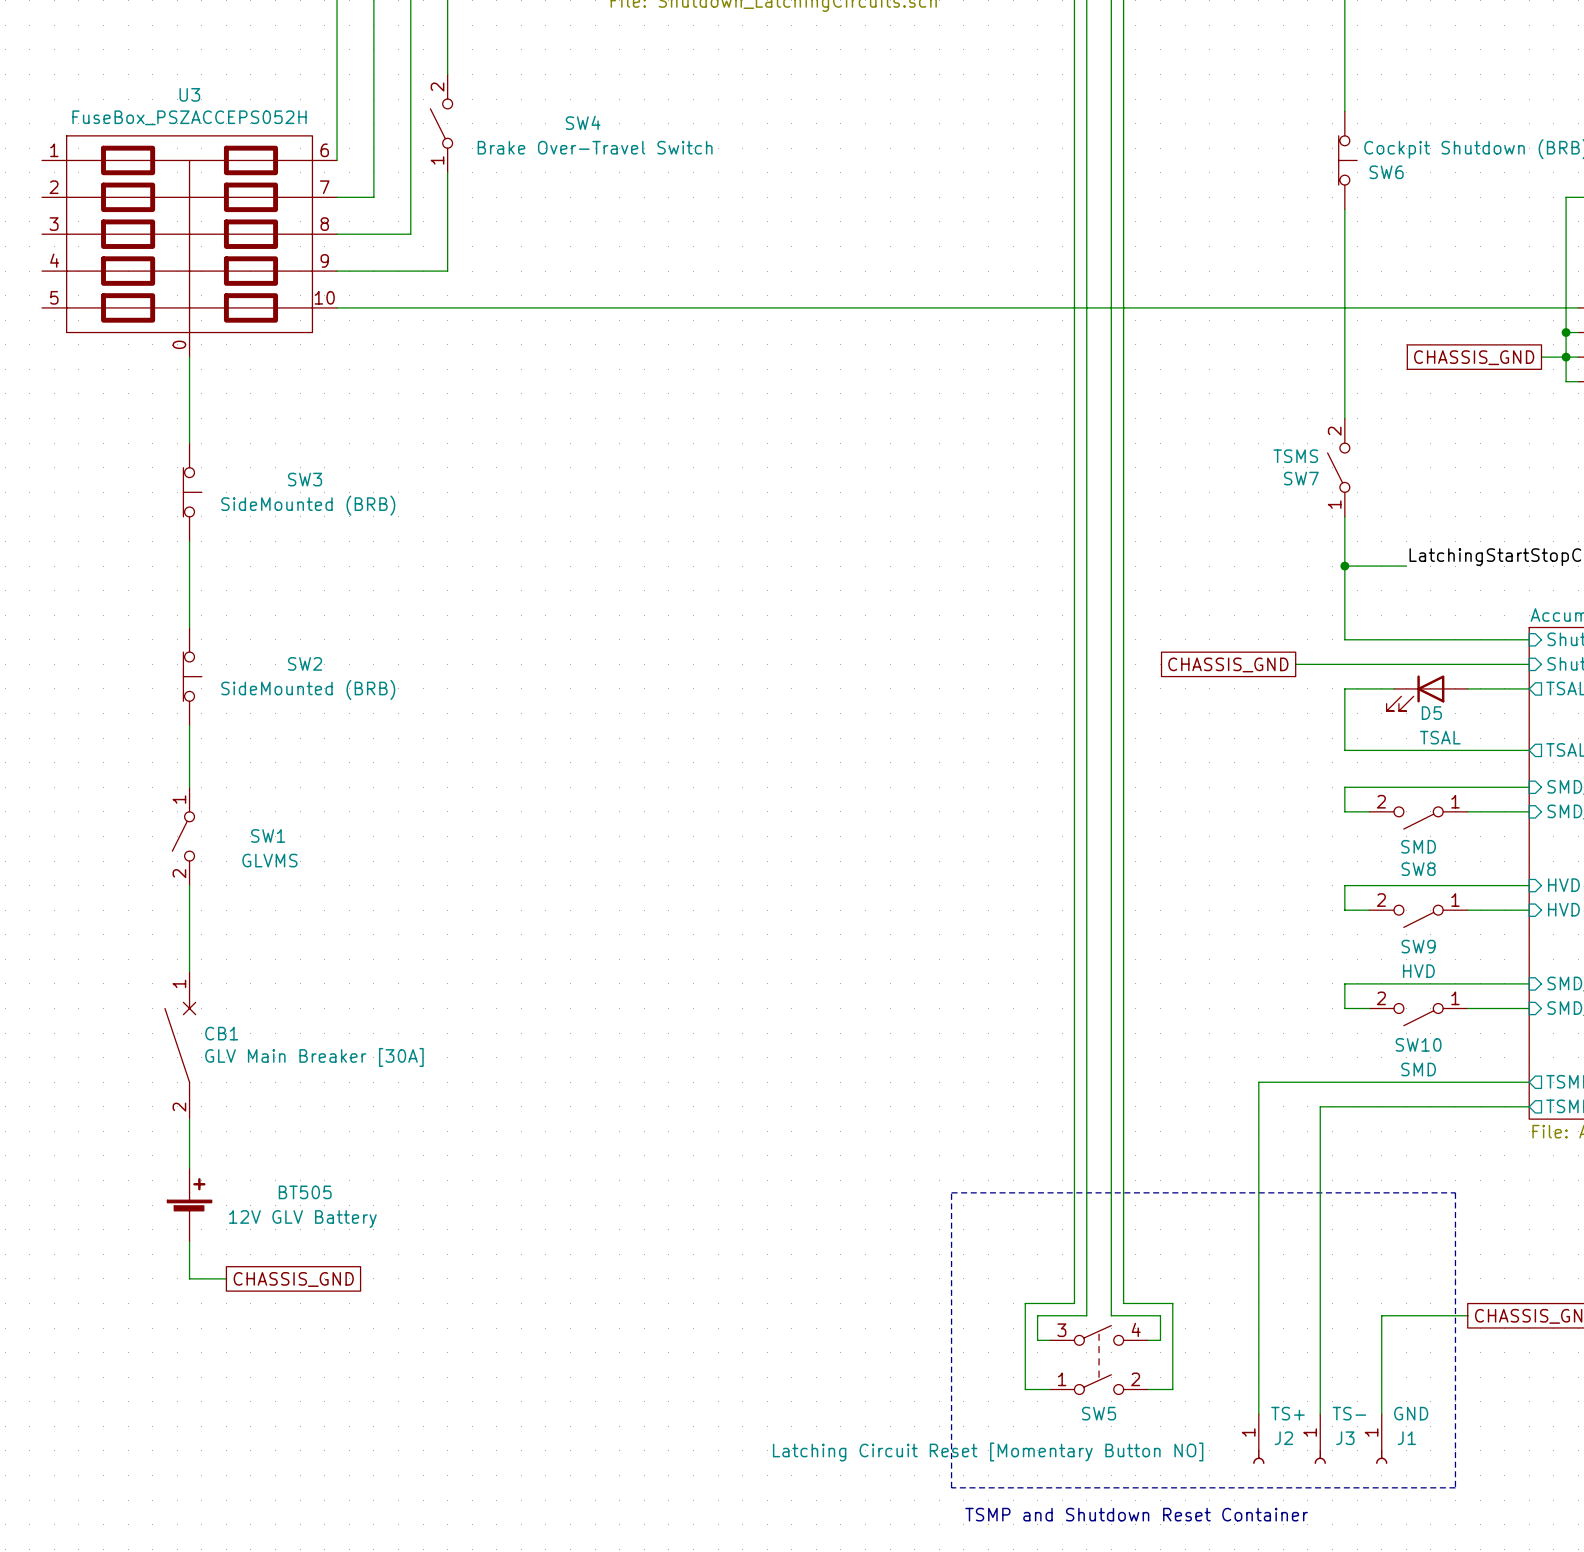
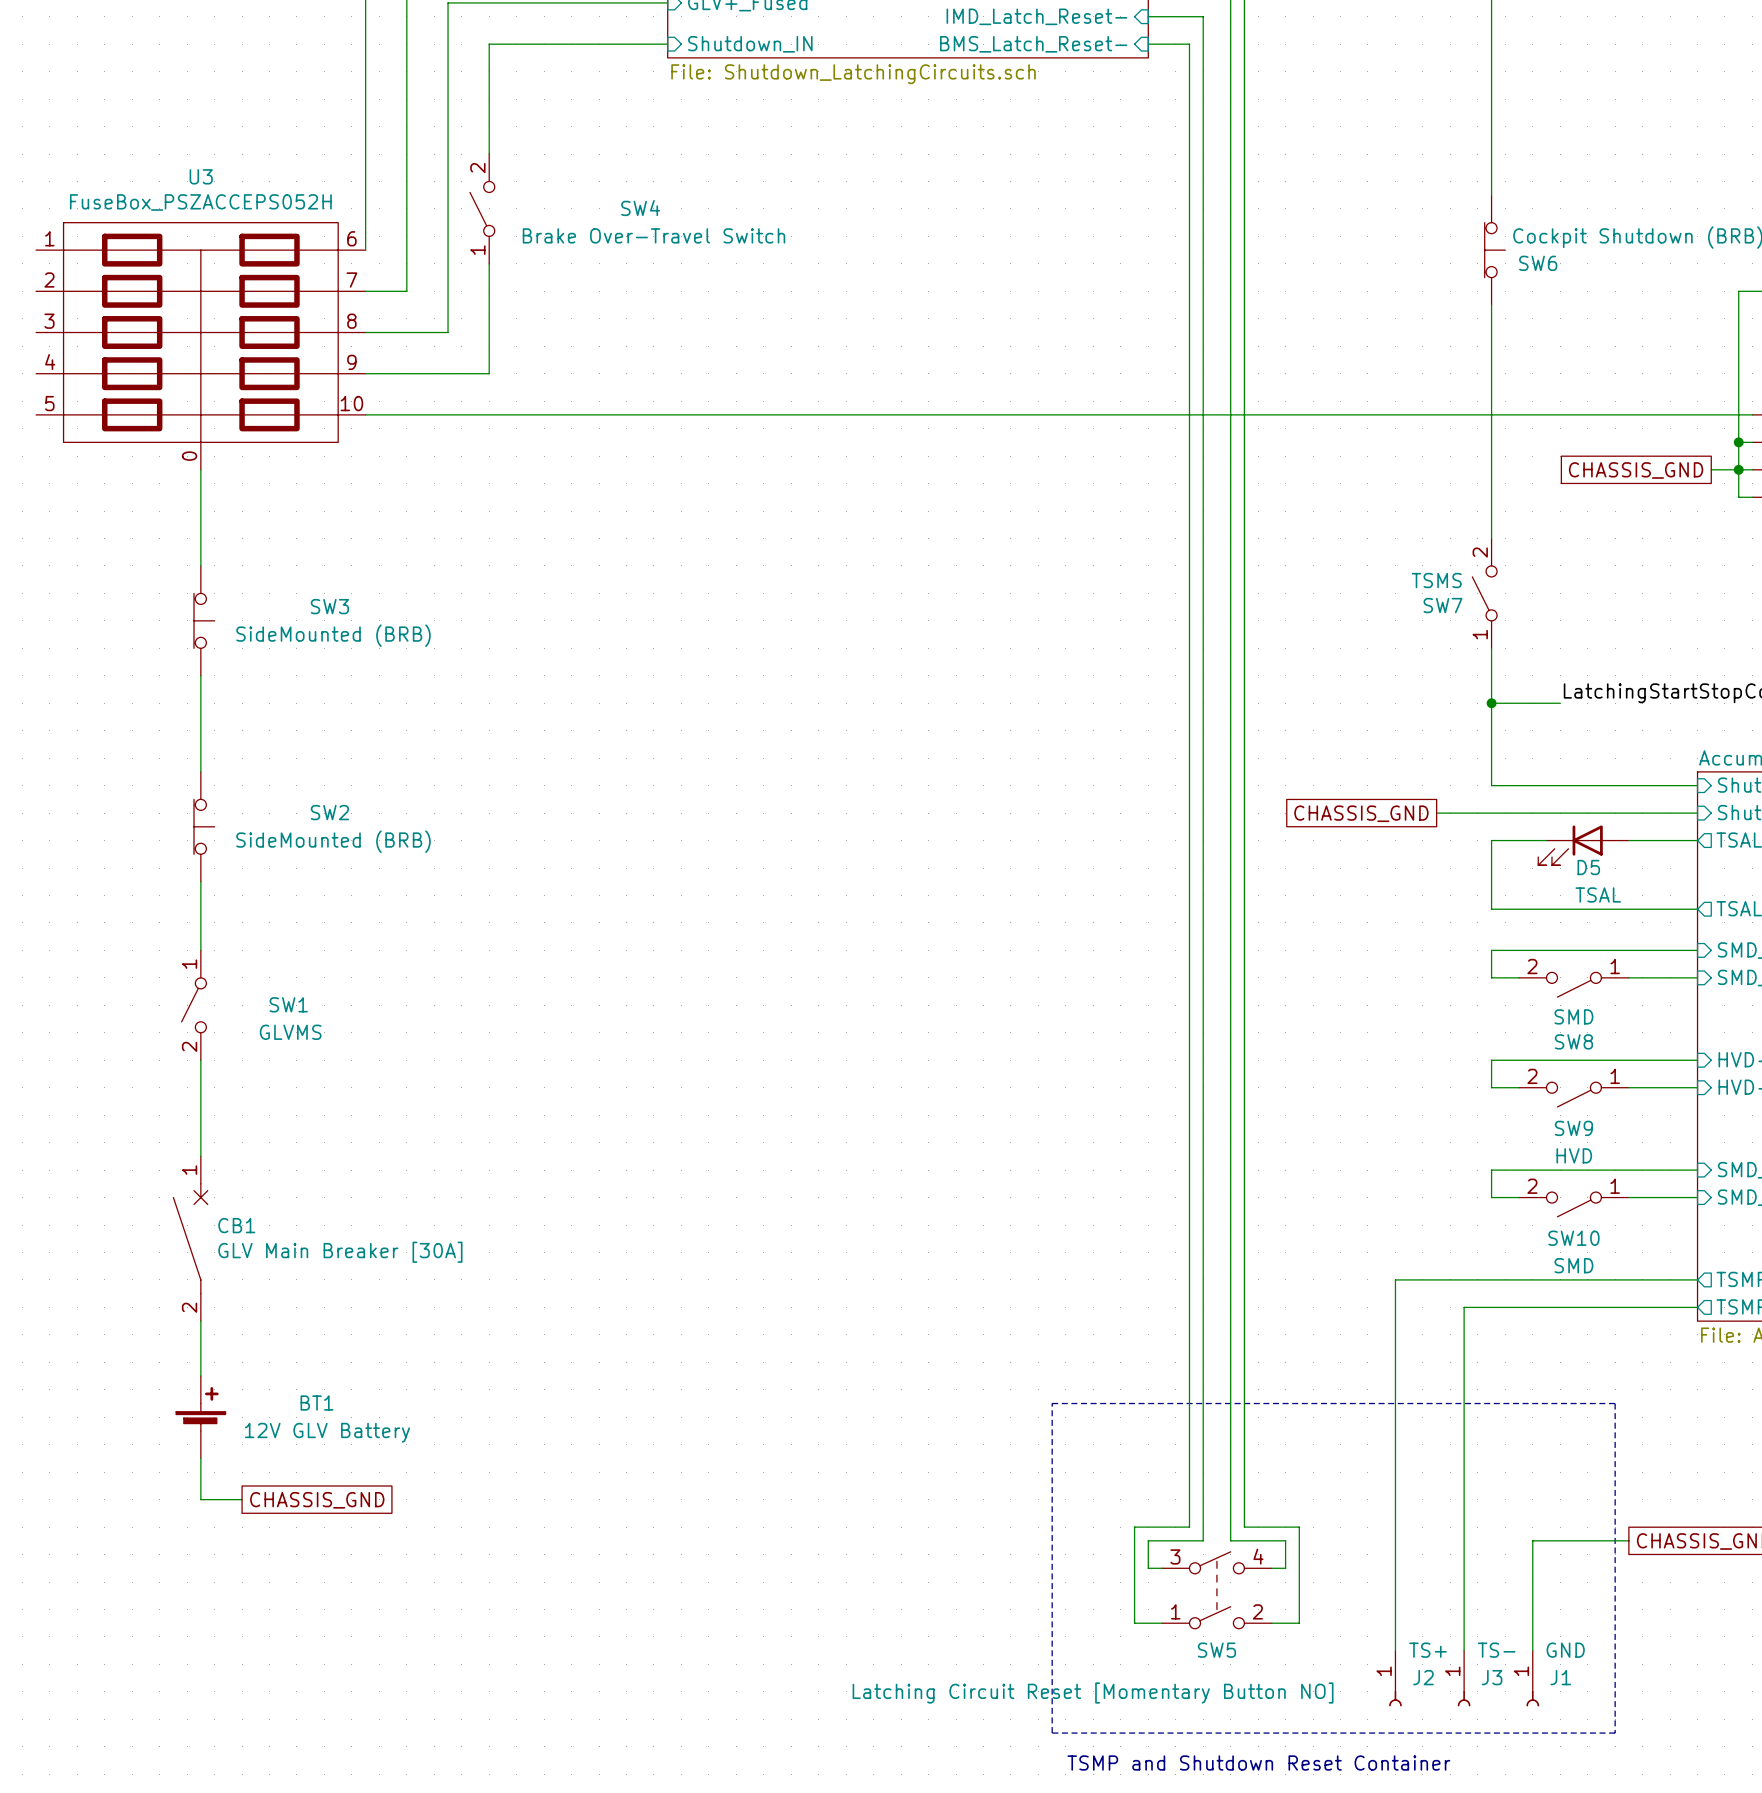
BT505 name: BT505 (305, 1192) -> BT1 (317, 1403)

